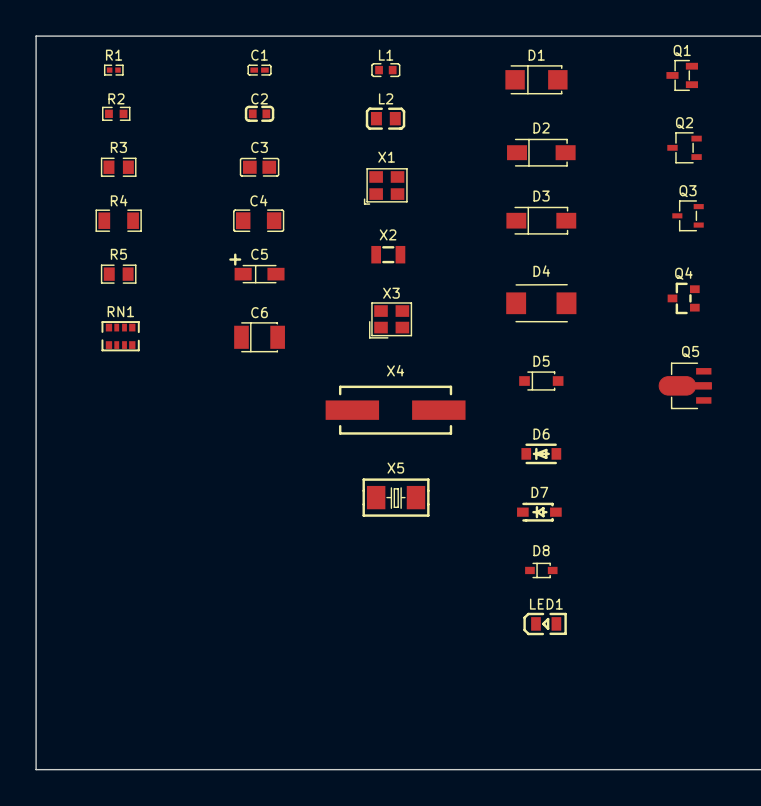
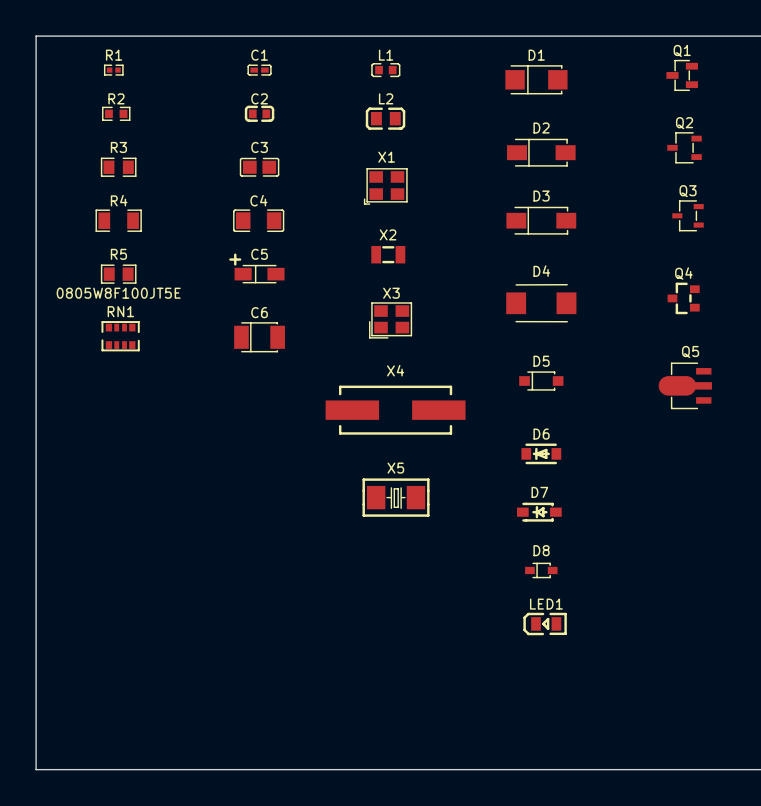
R5 value: none -> 0805W8F100JT5E (118, 293)

